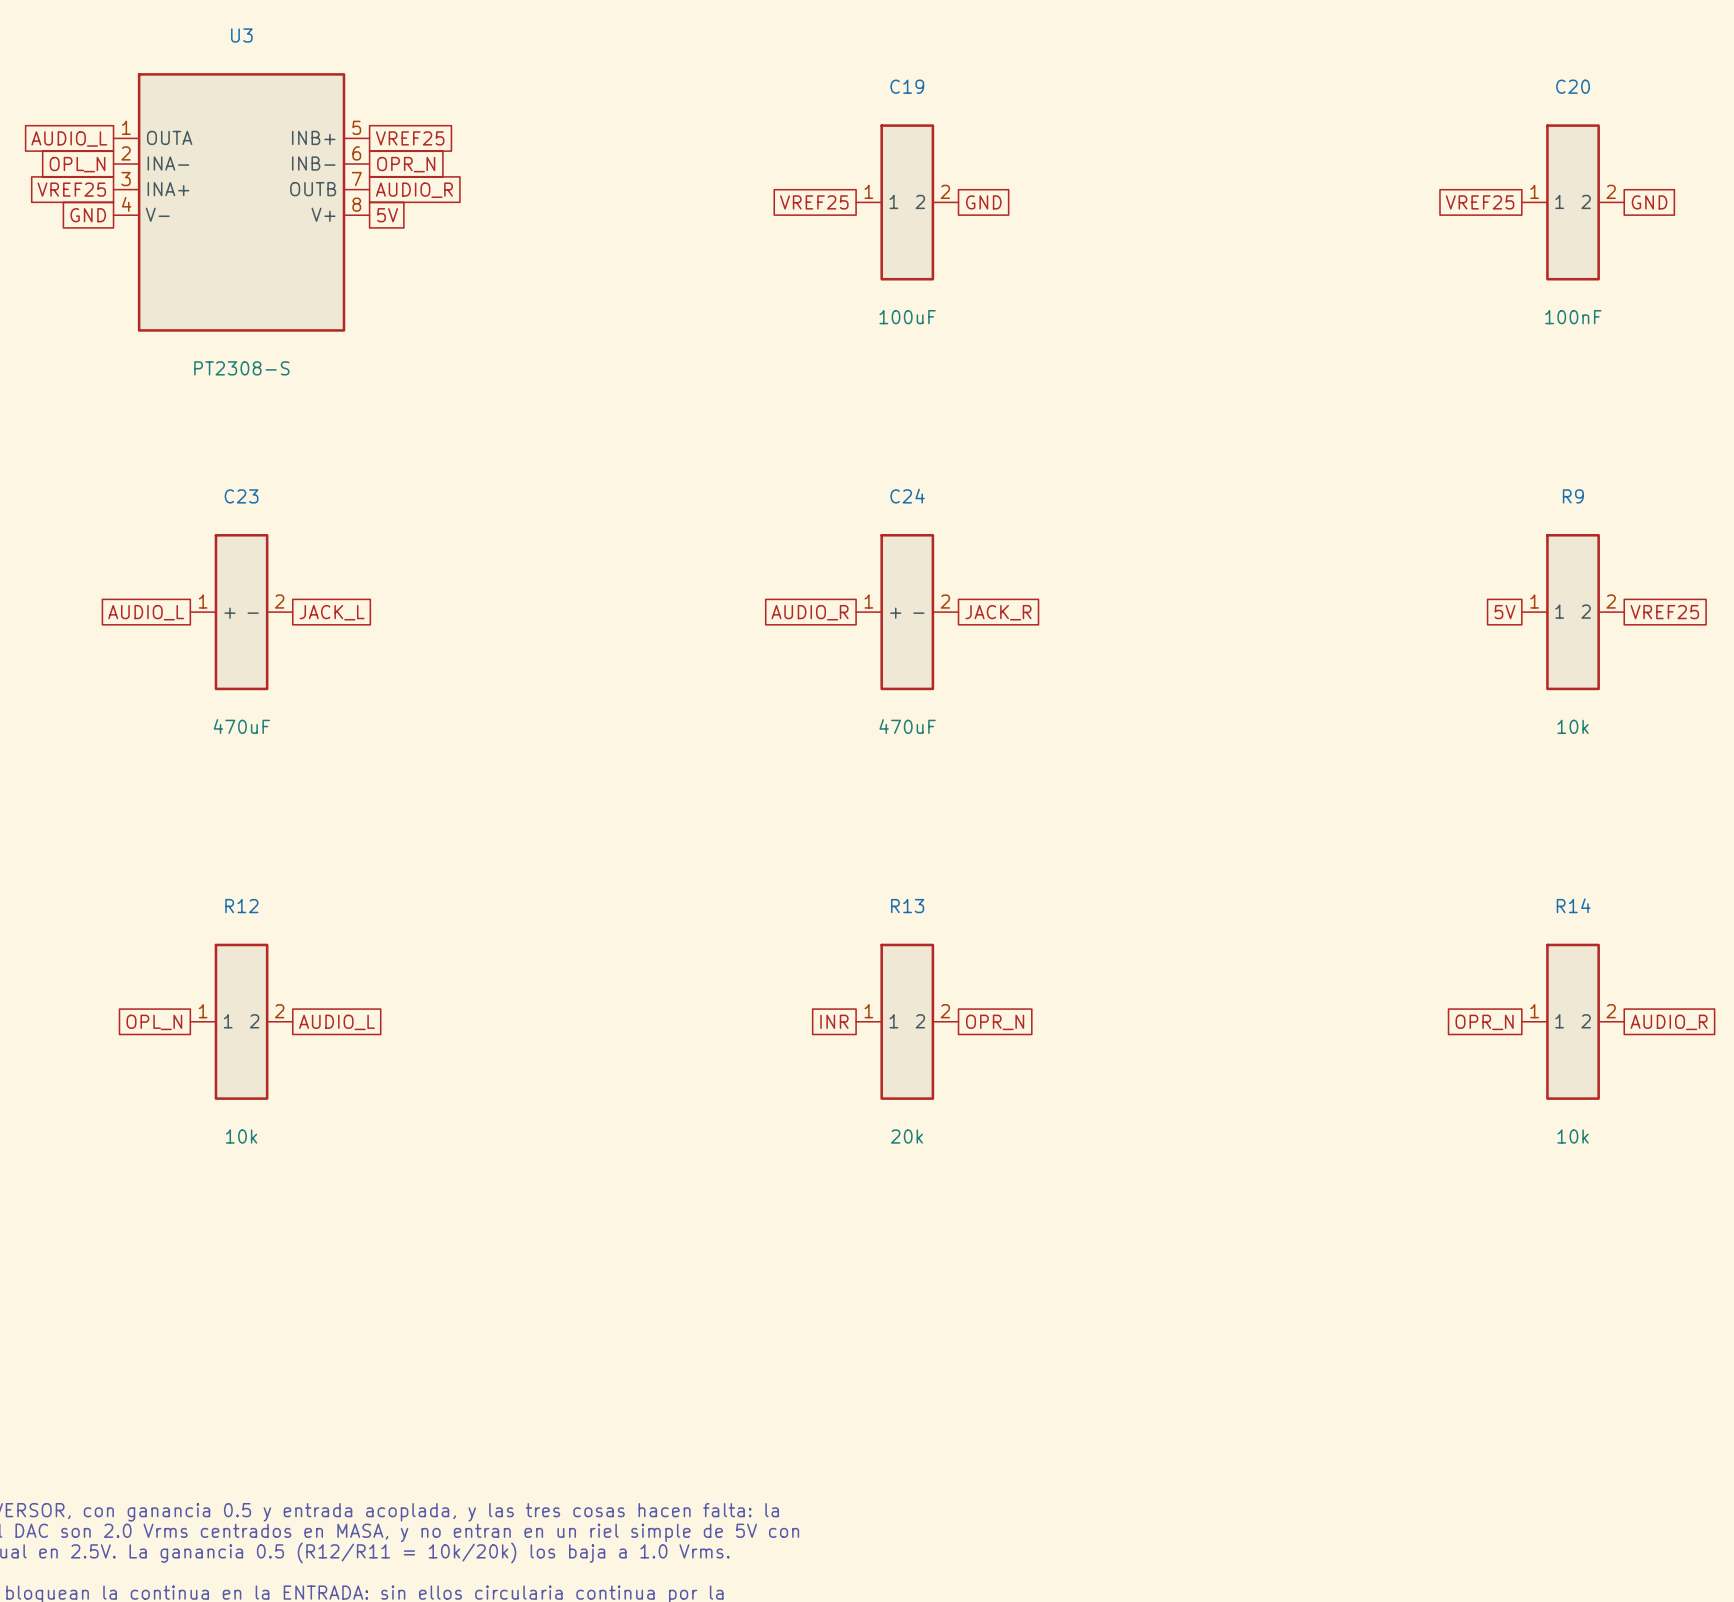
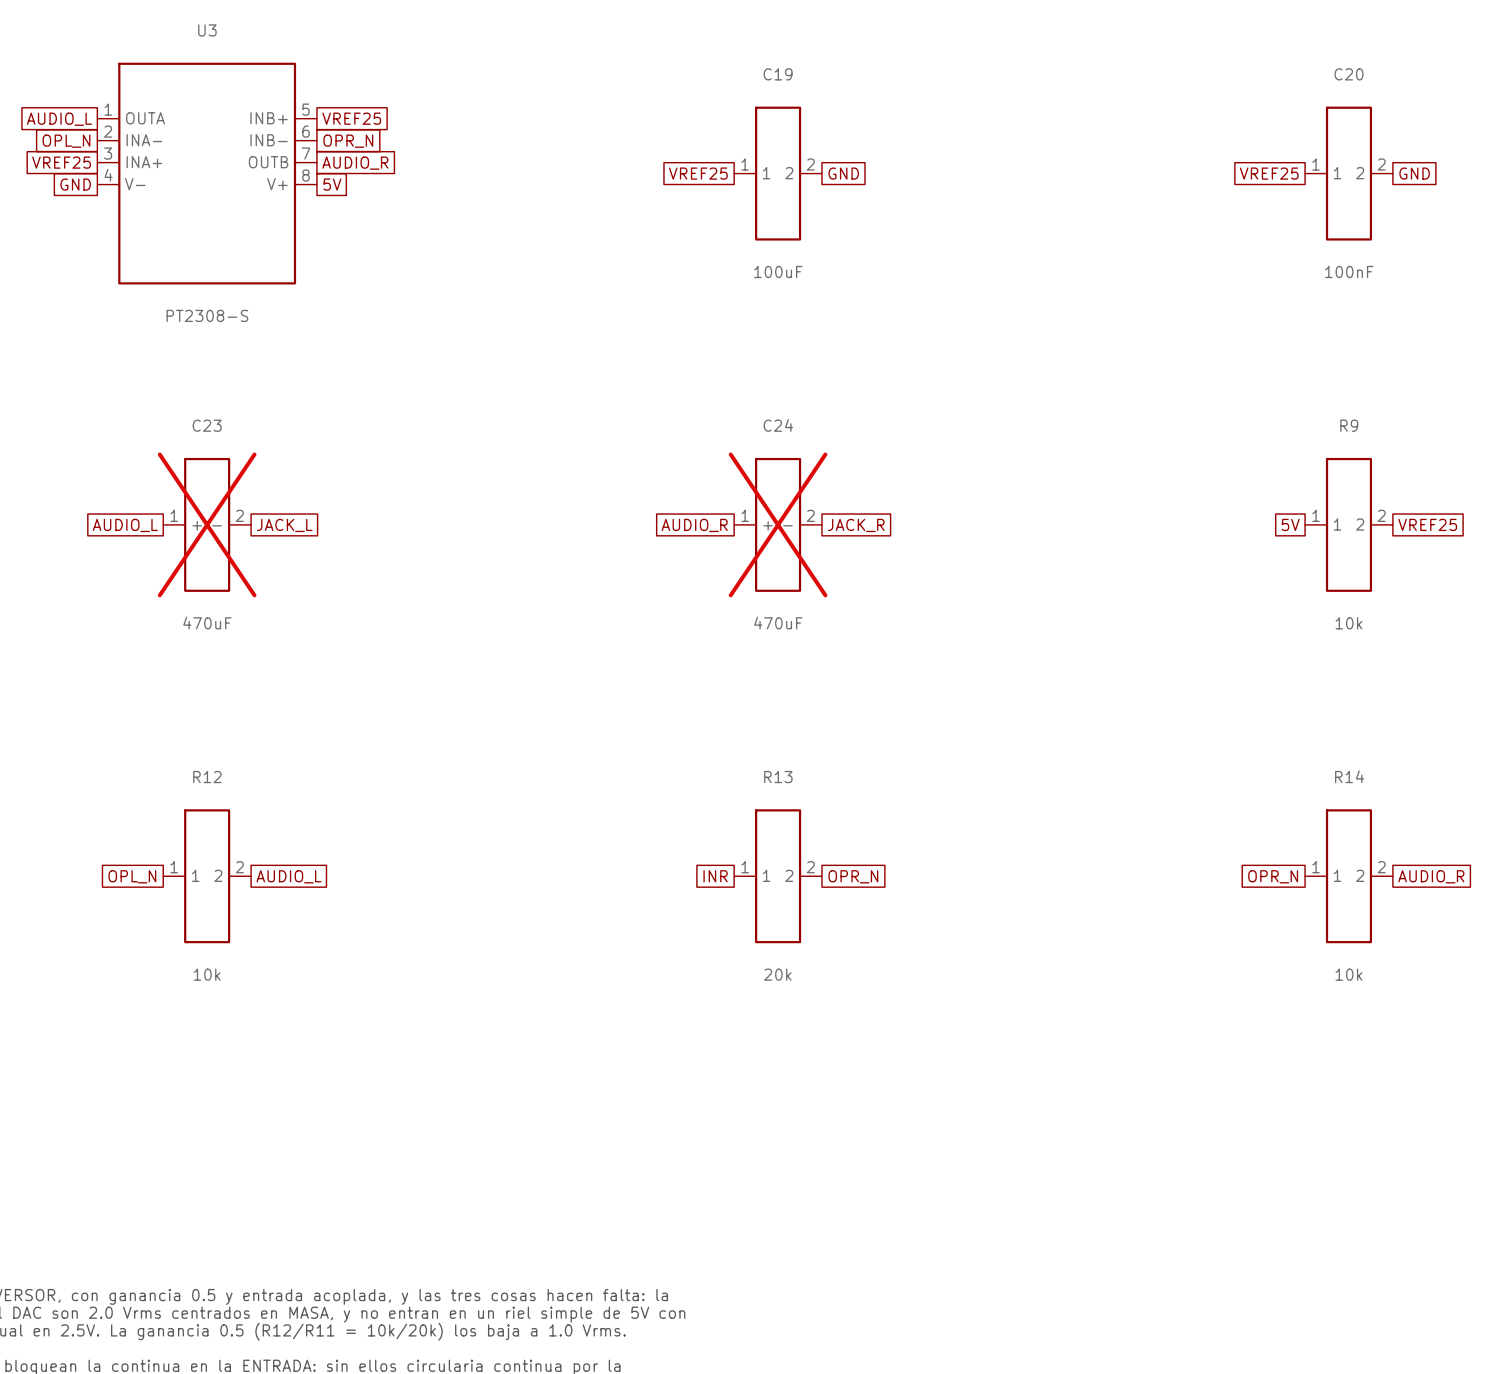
C23 do-not-place cross: none -> (207, 524)
C24 do-not-place cross: none -> (778, 524)

